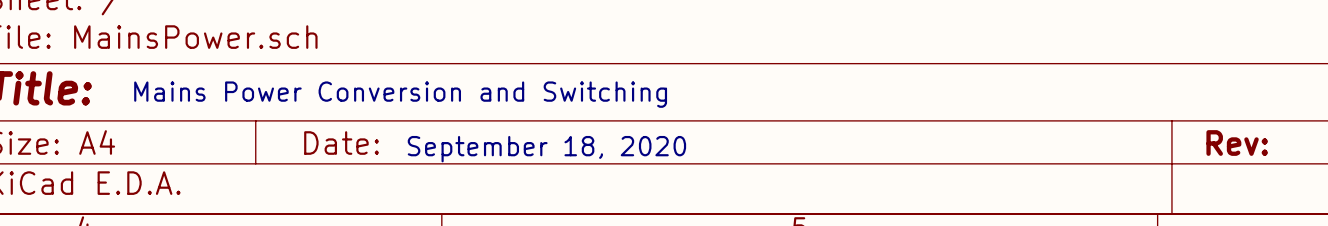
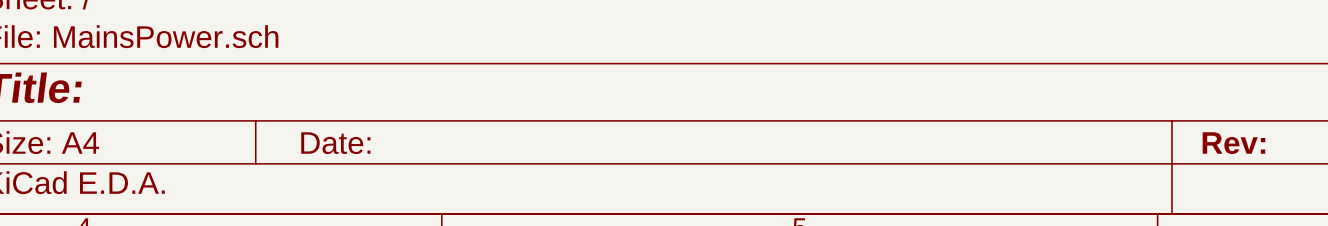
text: Mains Power Conversion and Switching (400, 94) -> none
text: September 18, 2020 (546, 149) -> none

